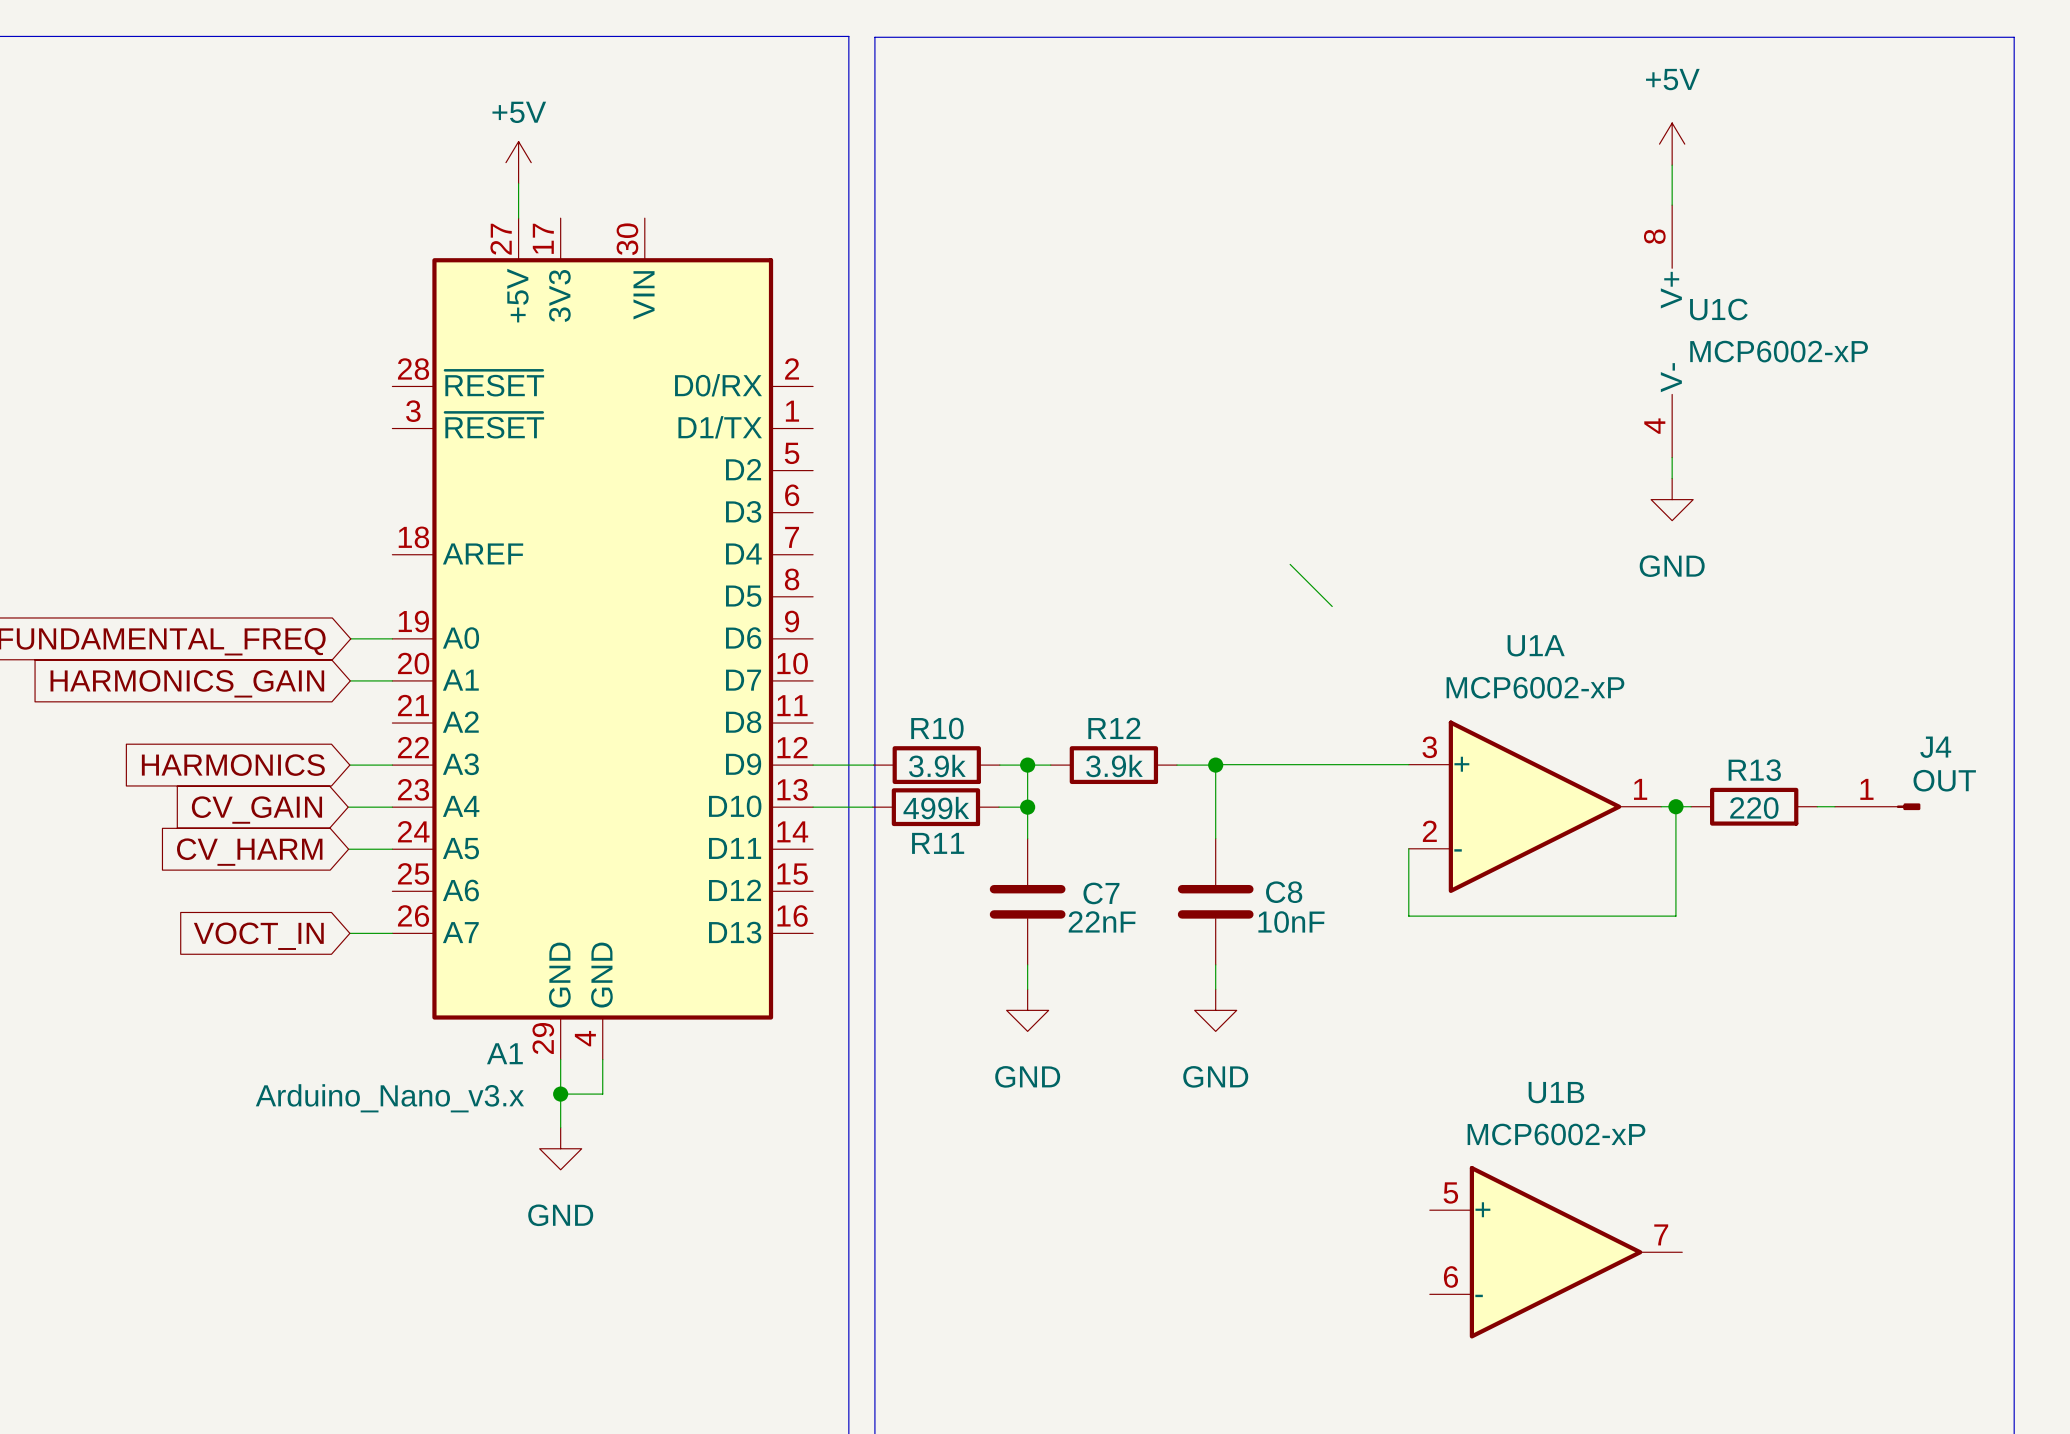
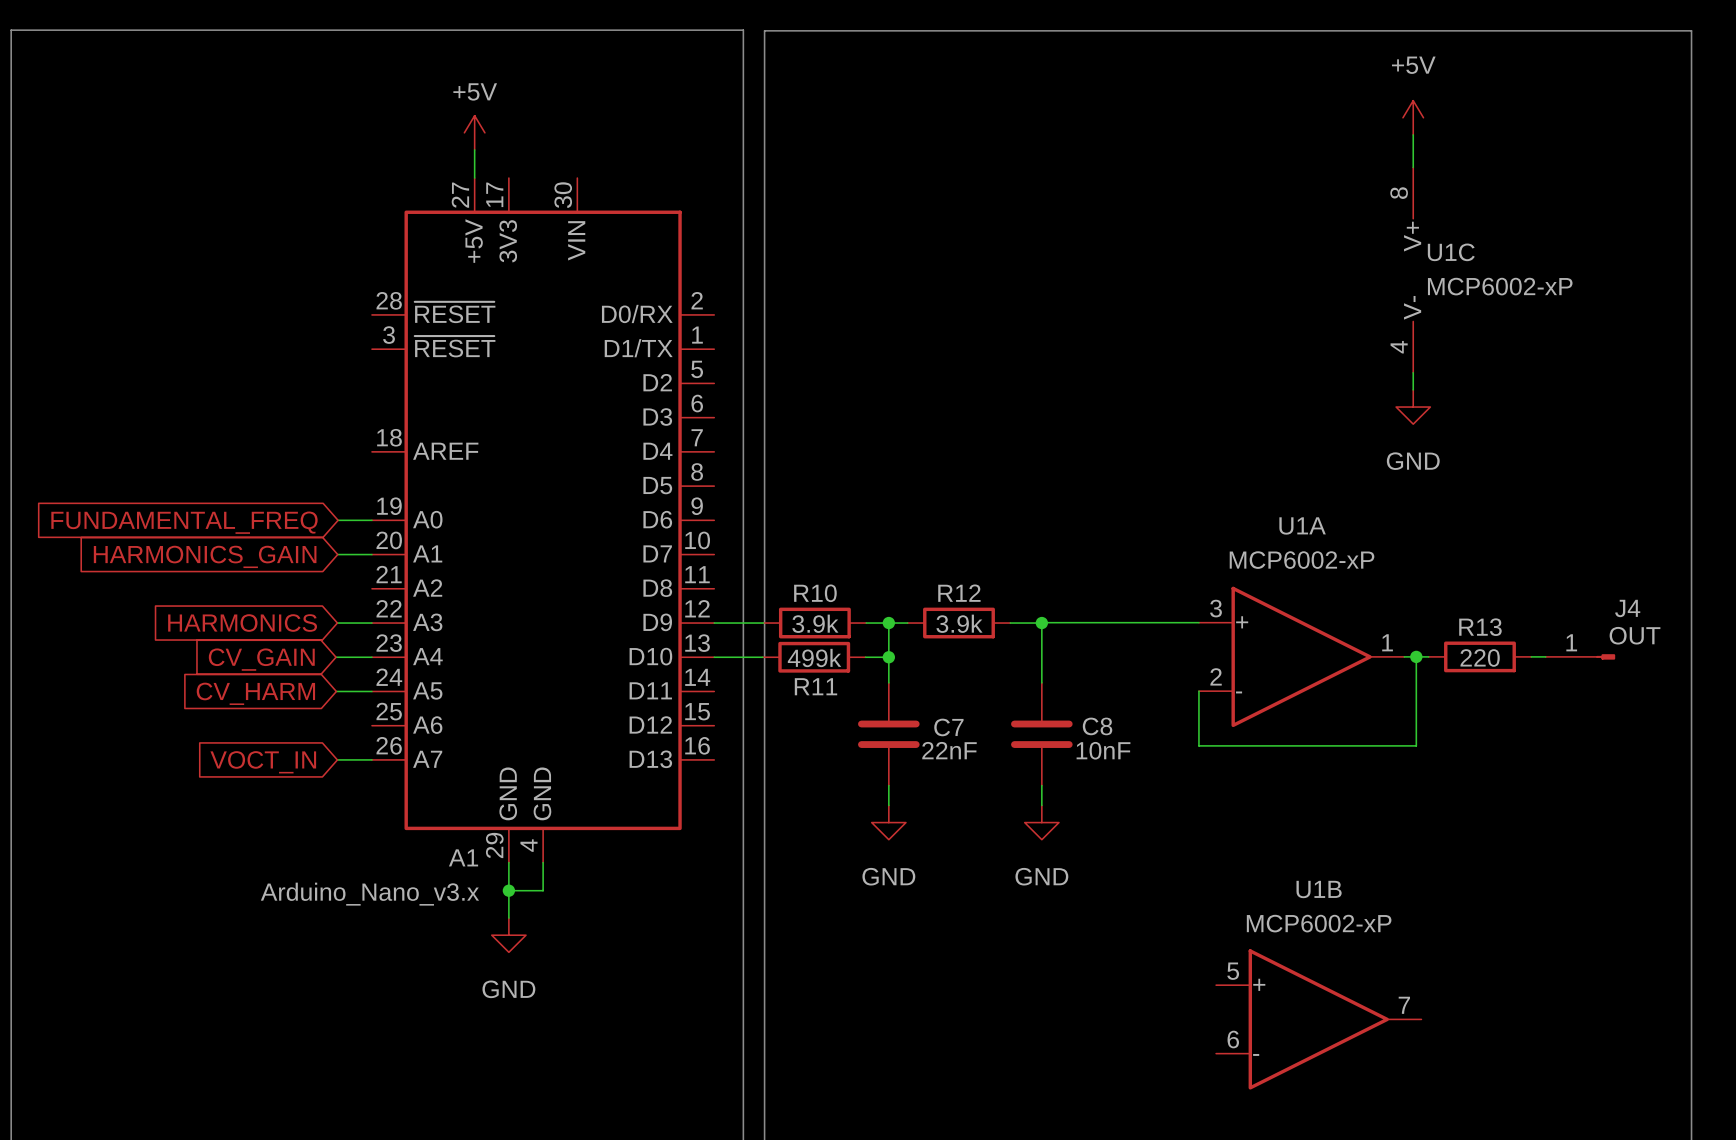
wire: (1290, 564) (1332, 606) -> none

